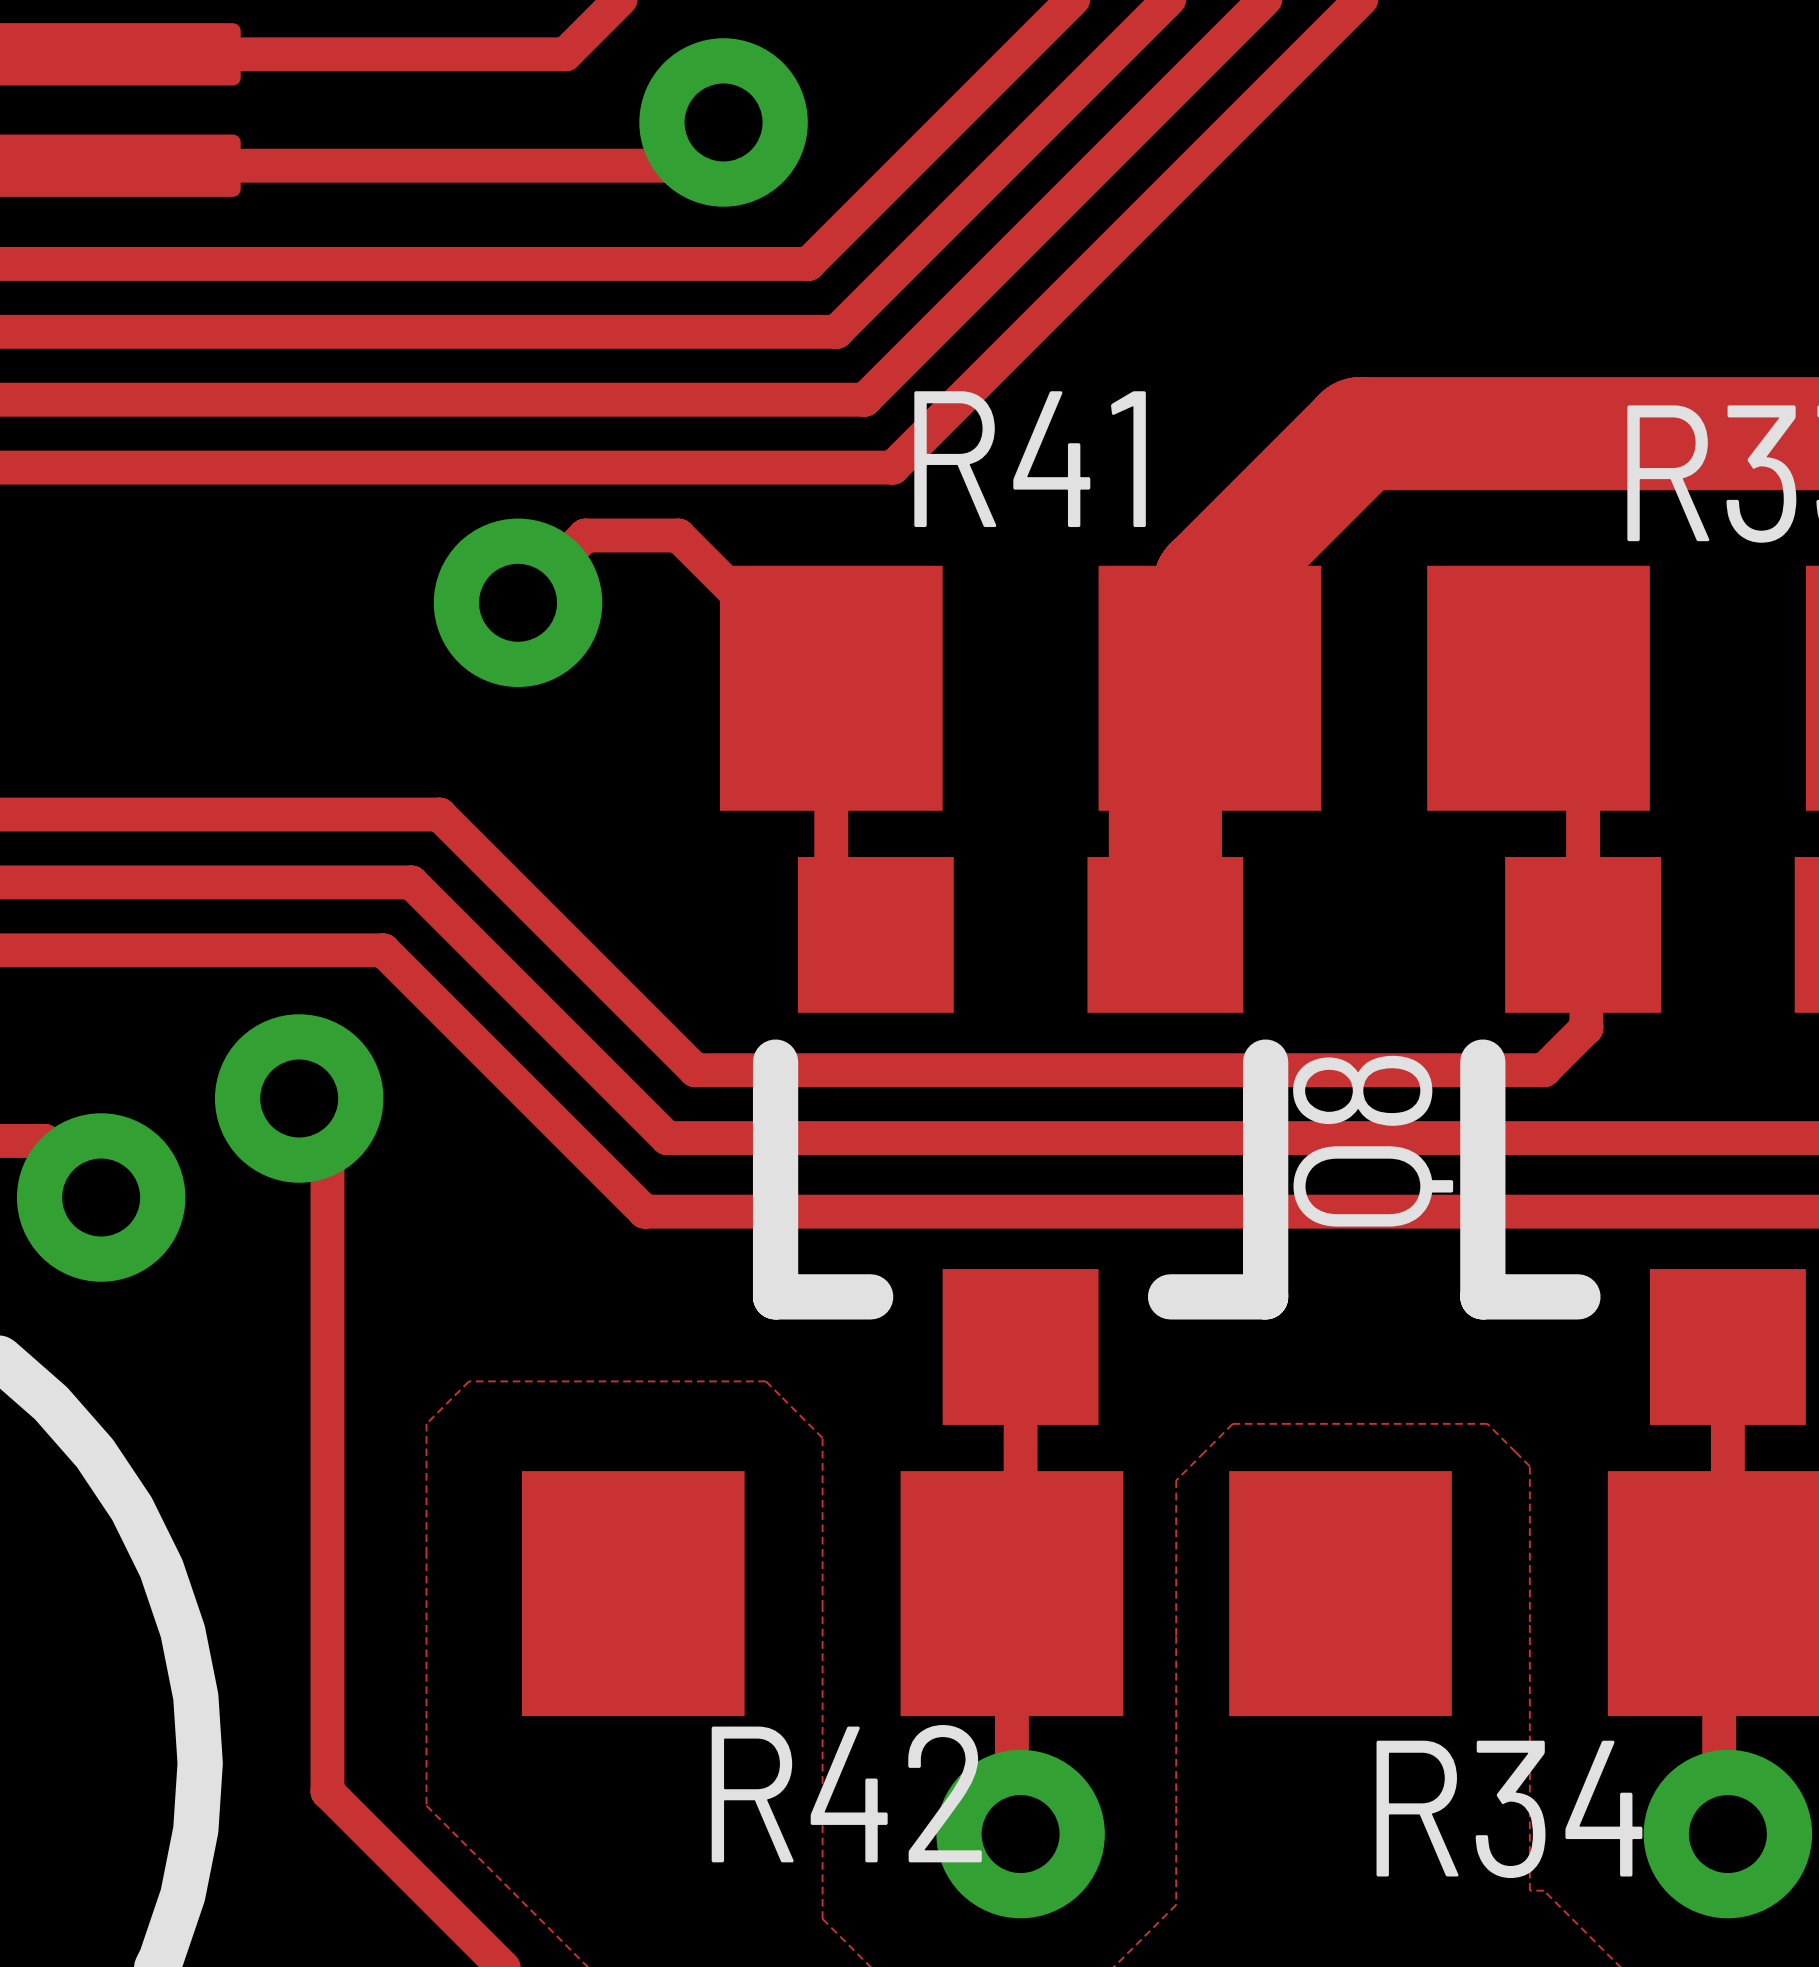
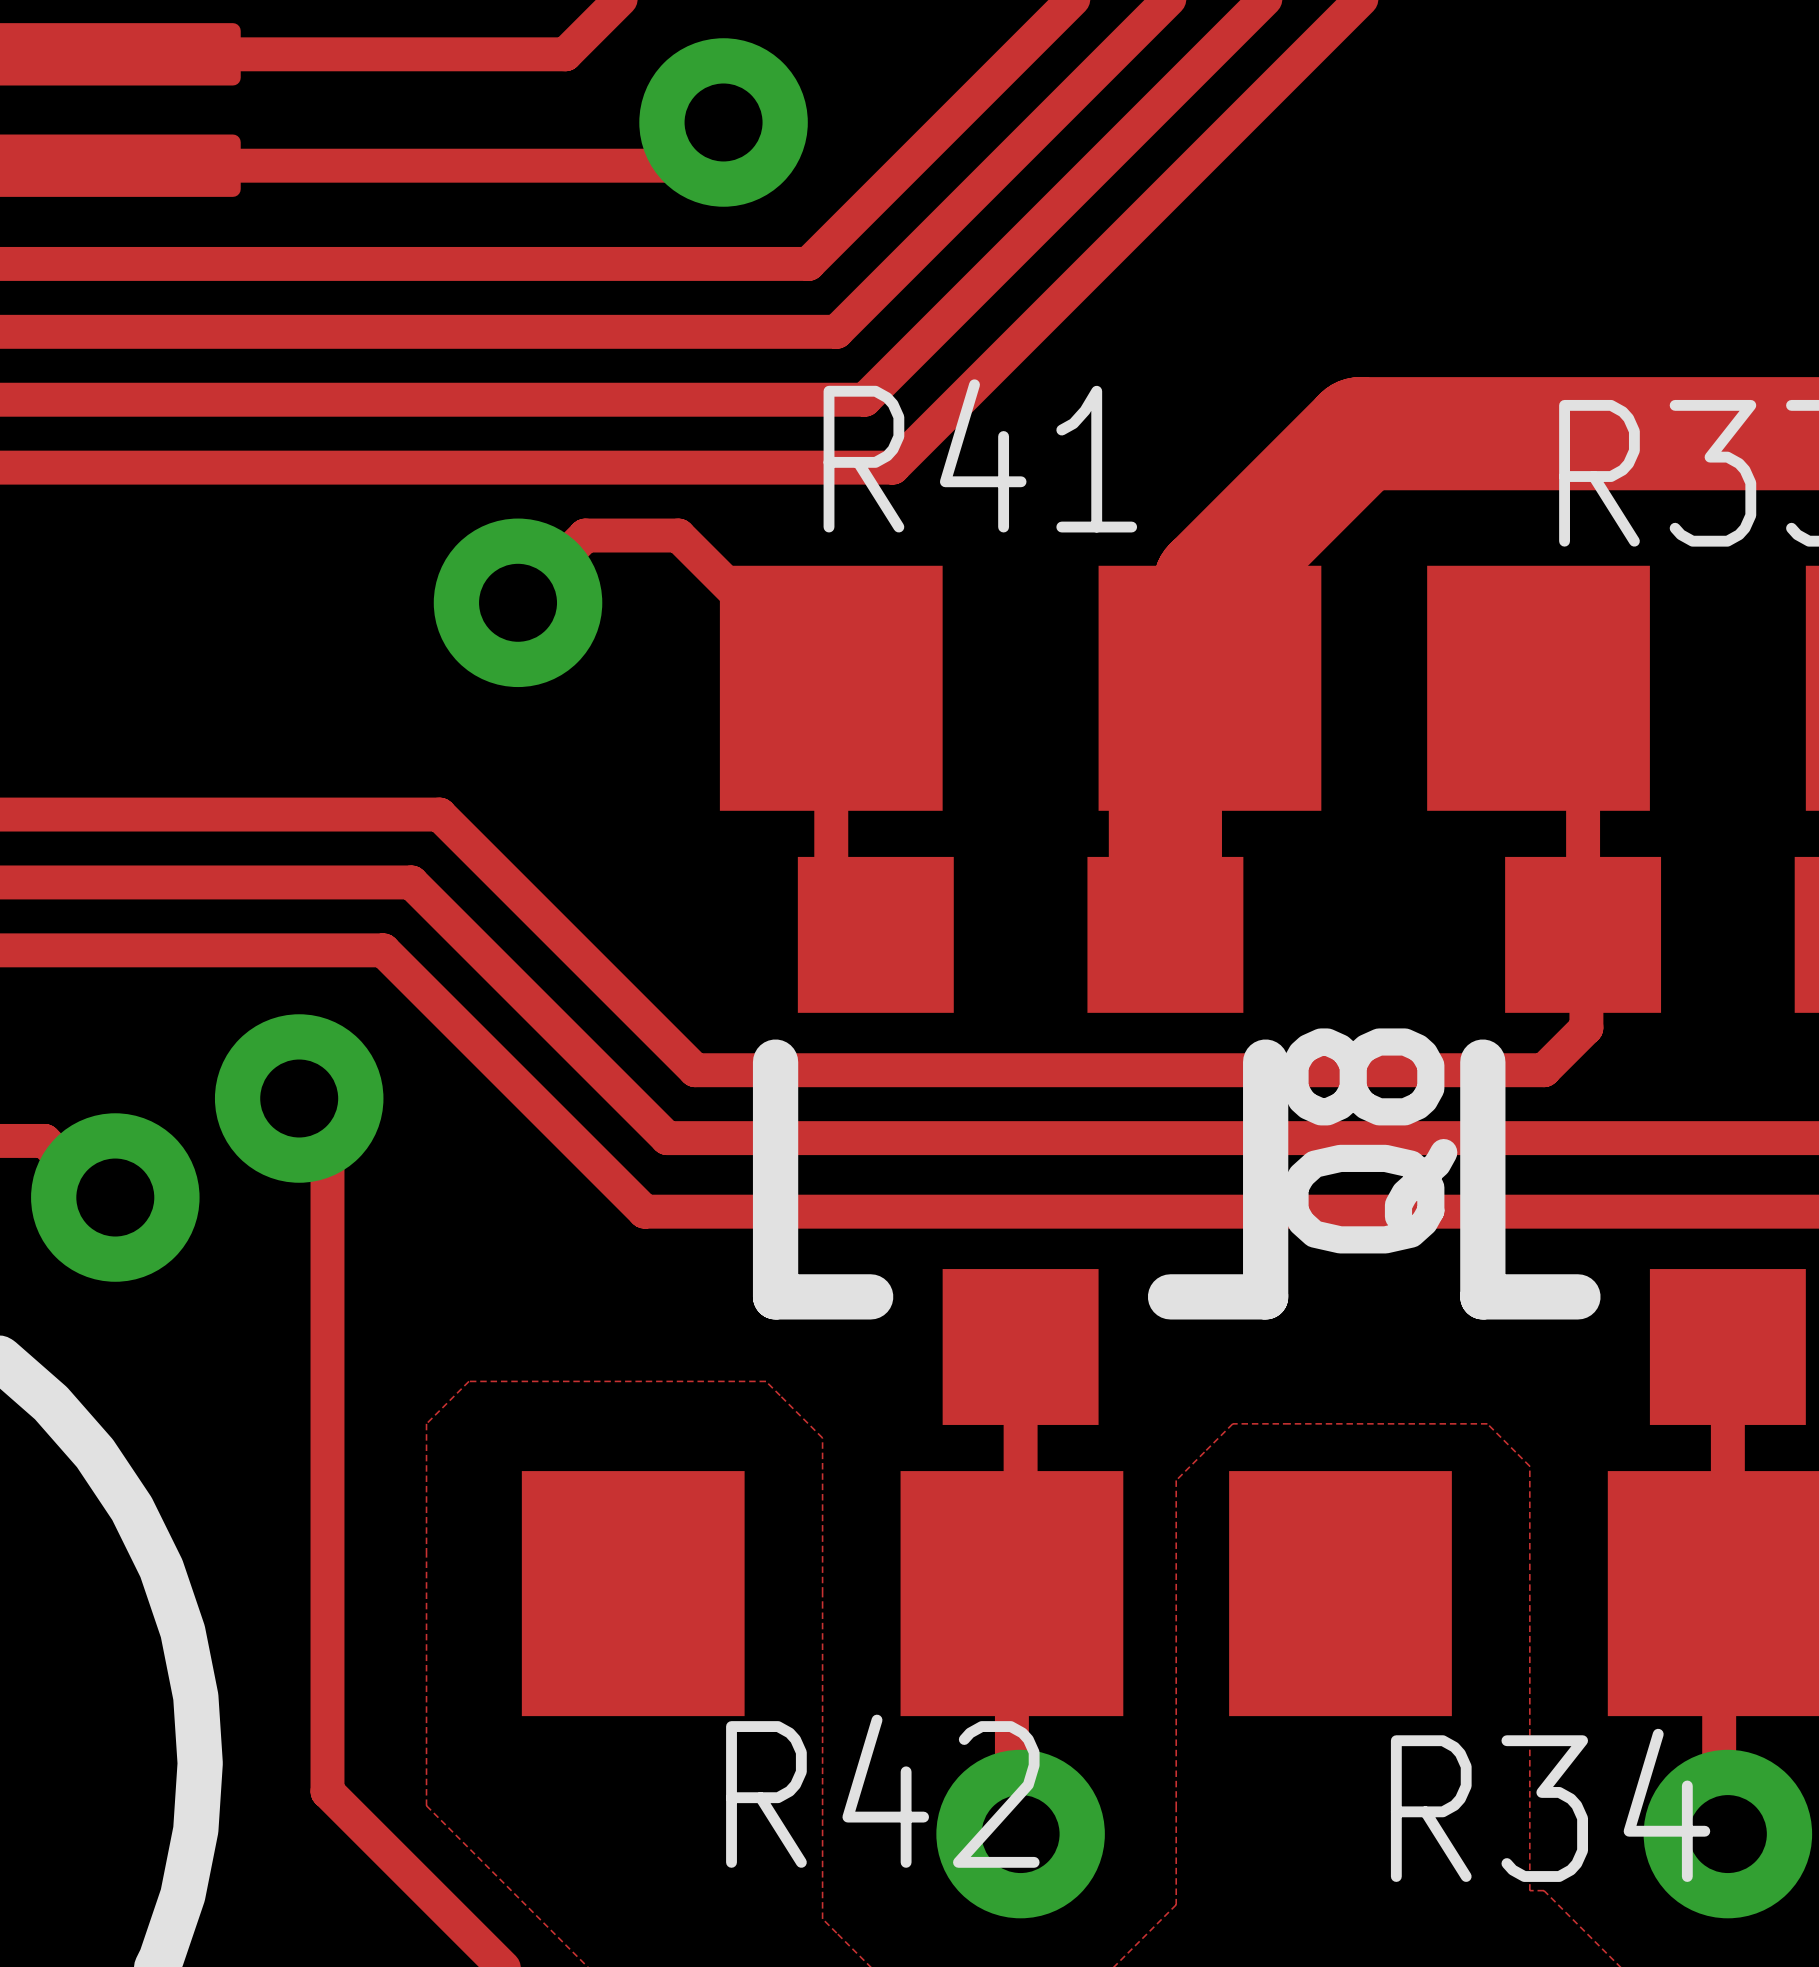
via position: (101, 1197) -> (115, 1197)

